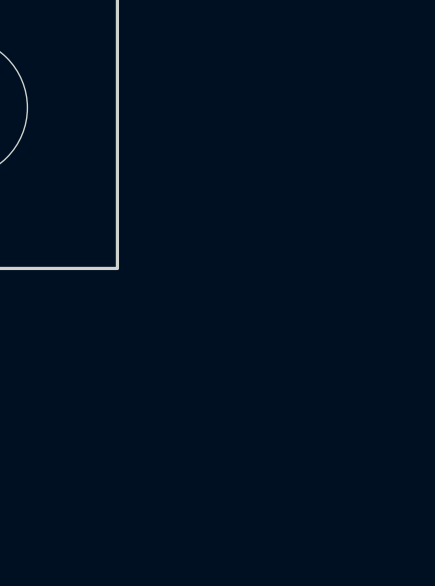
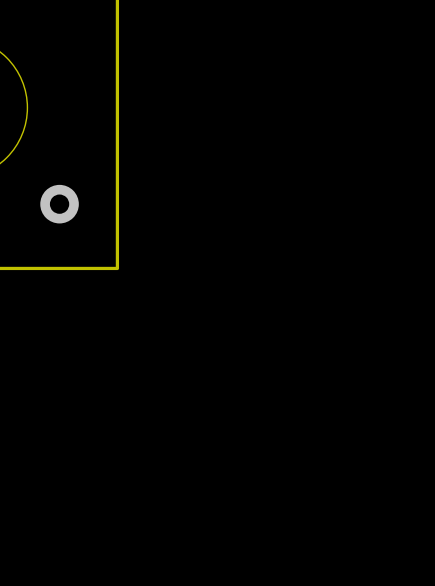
via: none -> (59, 204)

